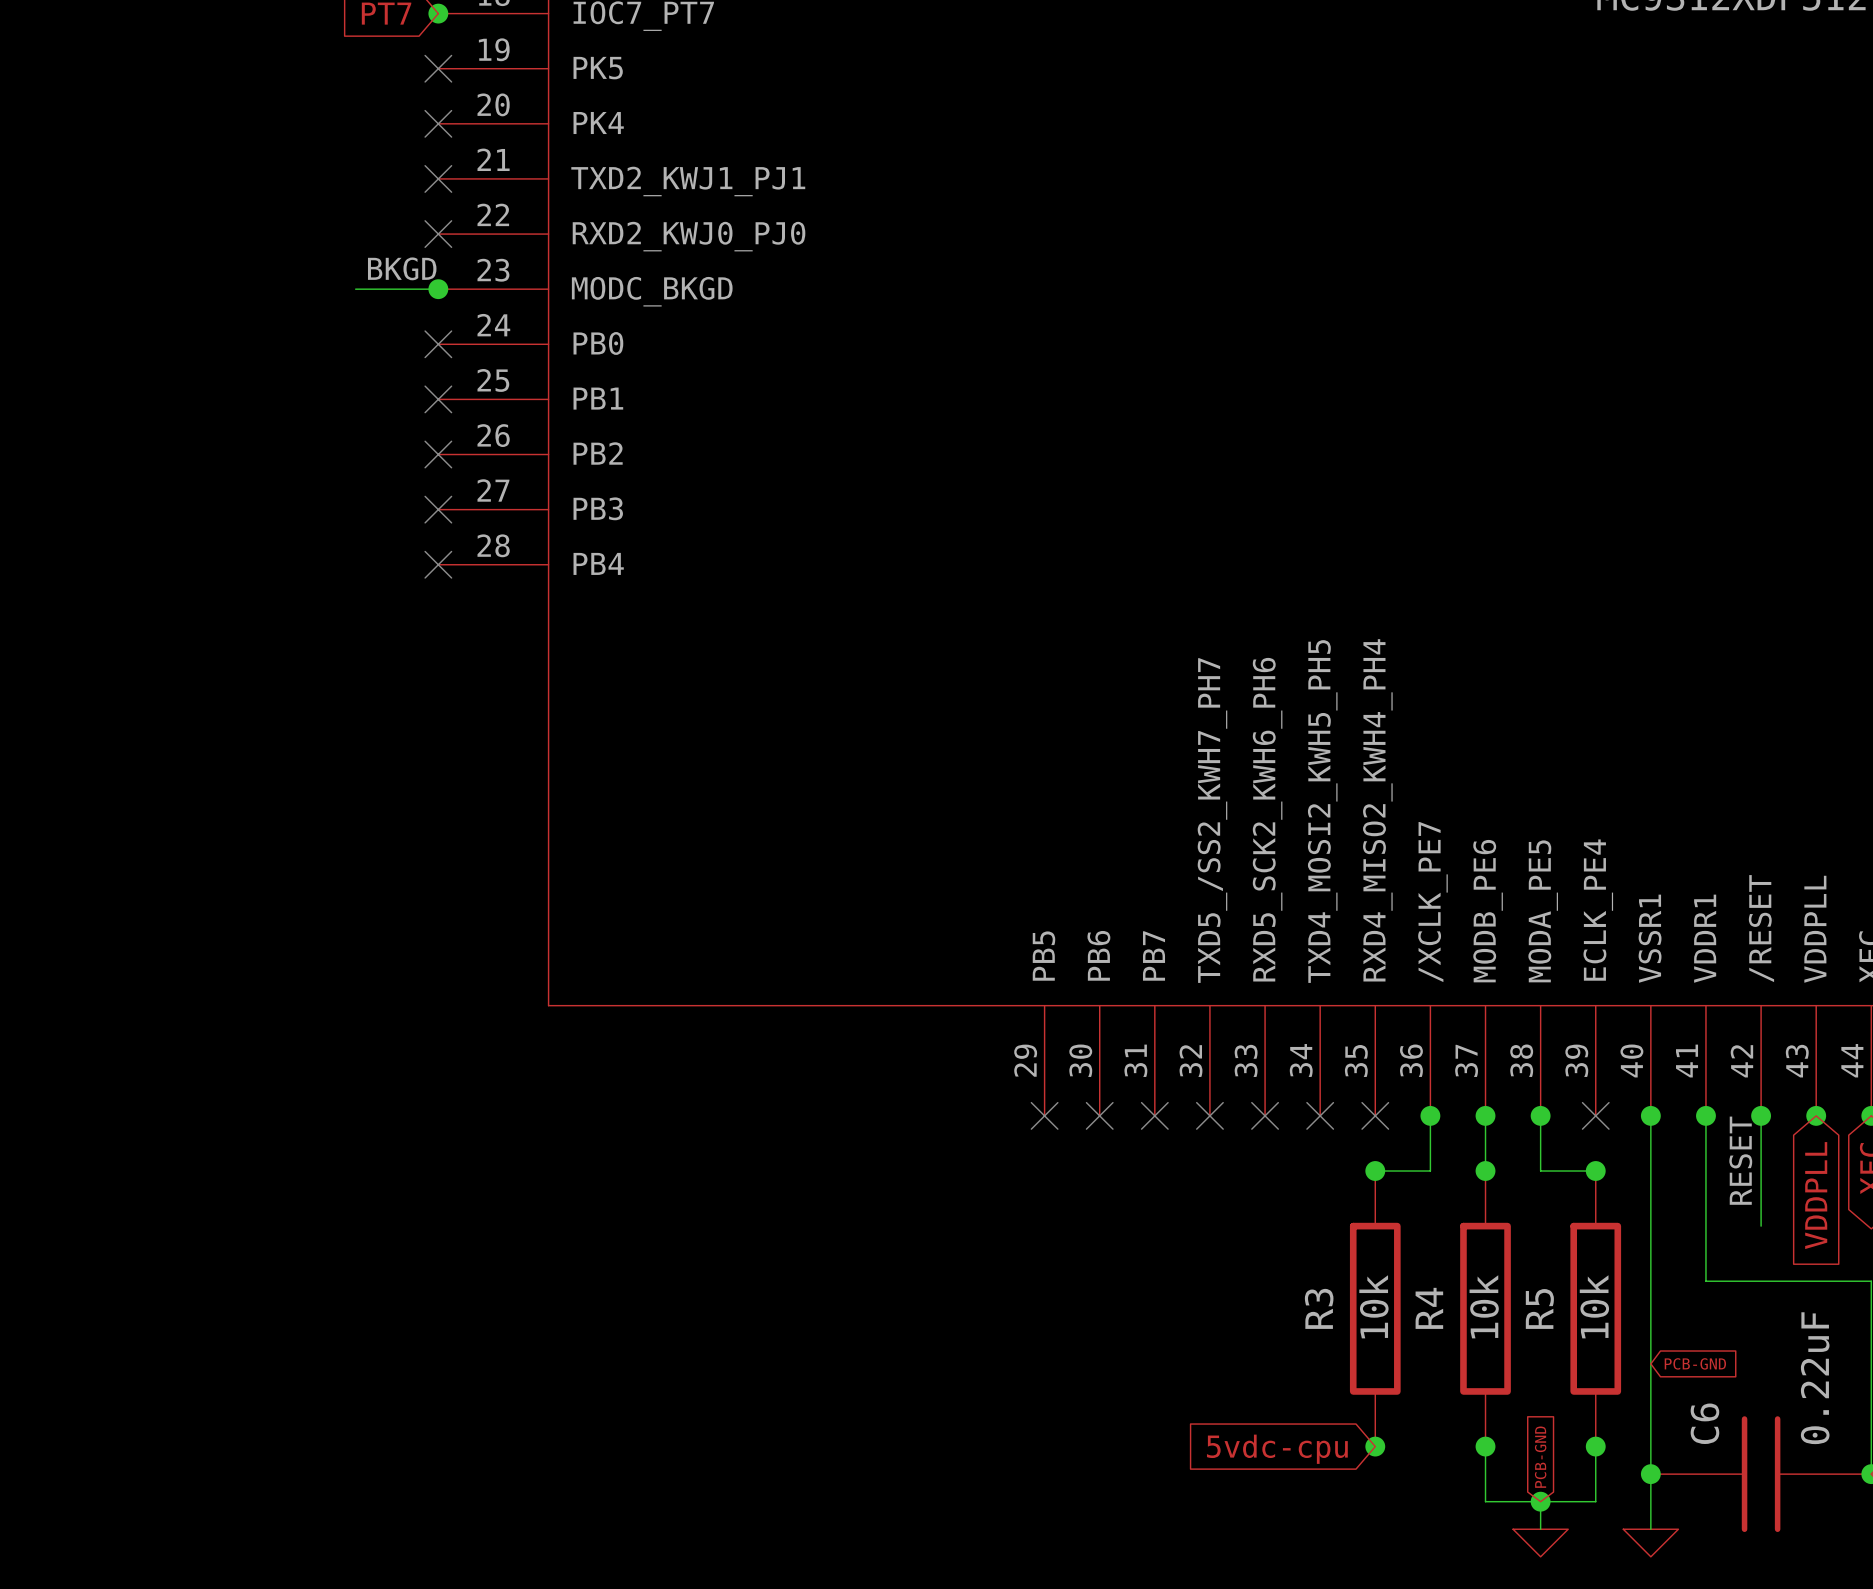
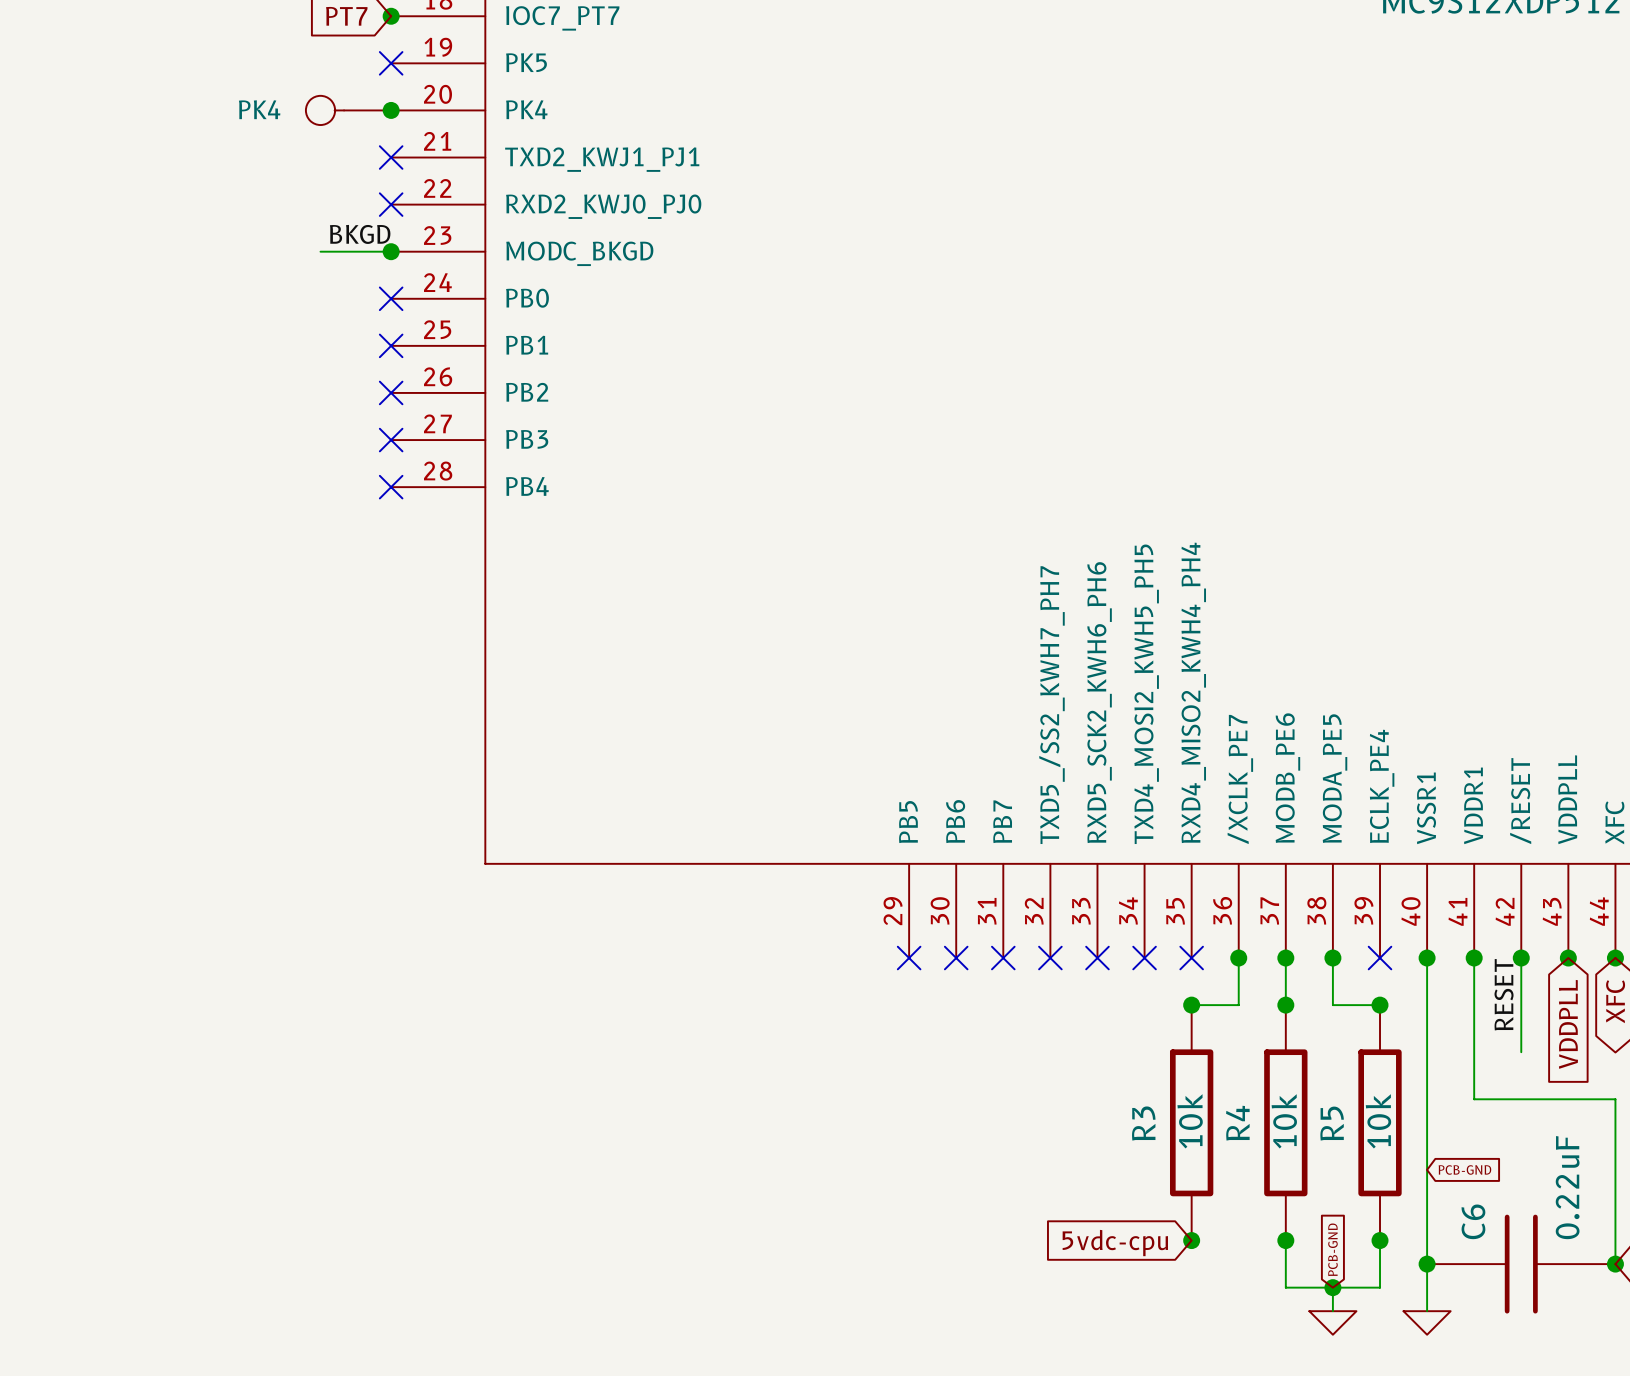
PK4: none -> (348, 110)
no-connect mark: (438, 123) -> none
junction: none -> (391, 110)

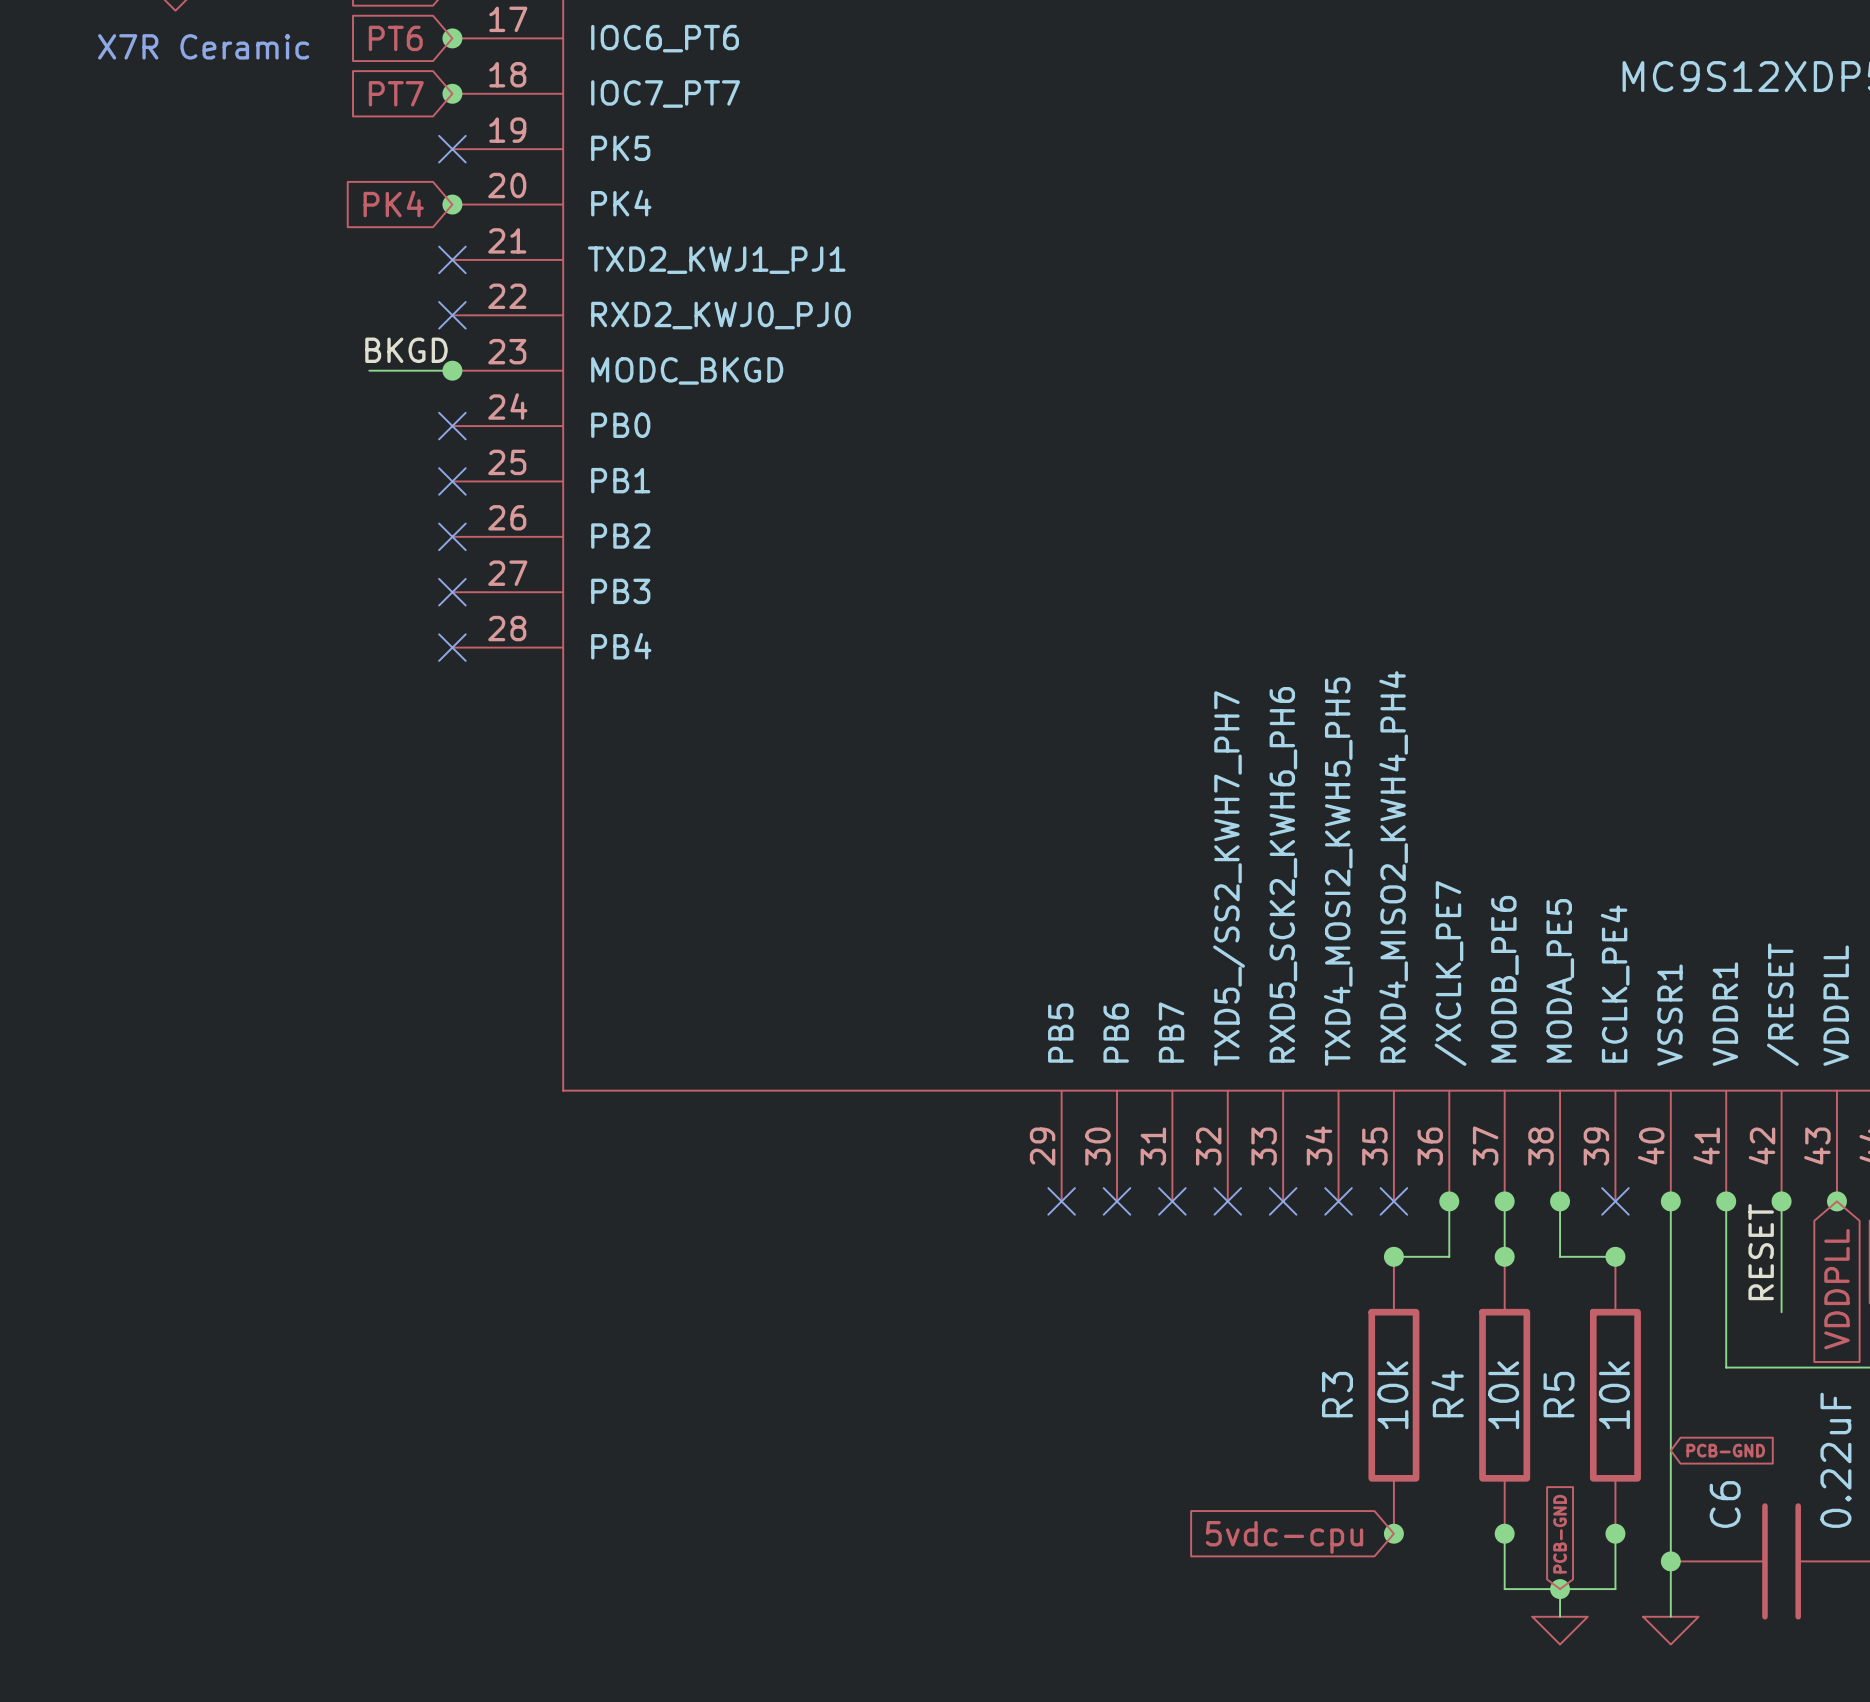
global label: none -> PK4 (393, 204)
PK4: (348, 110) -> none

